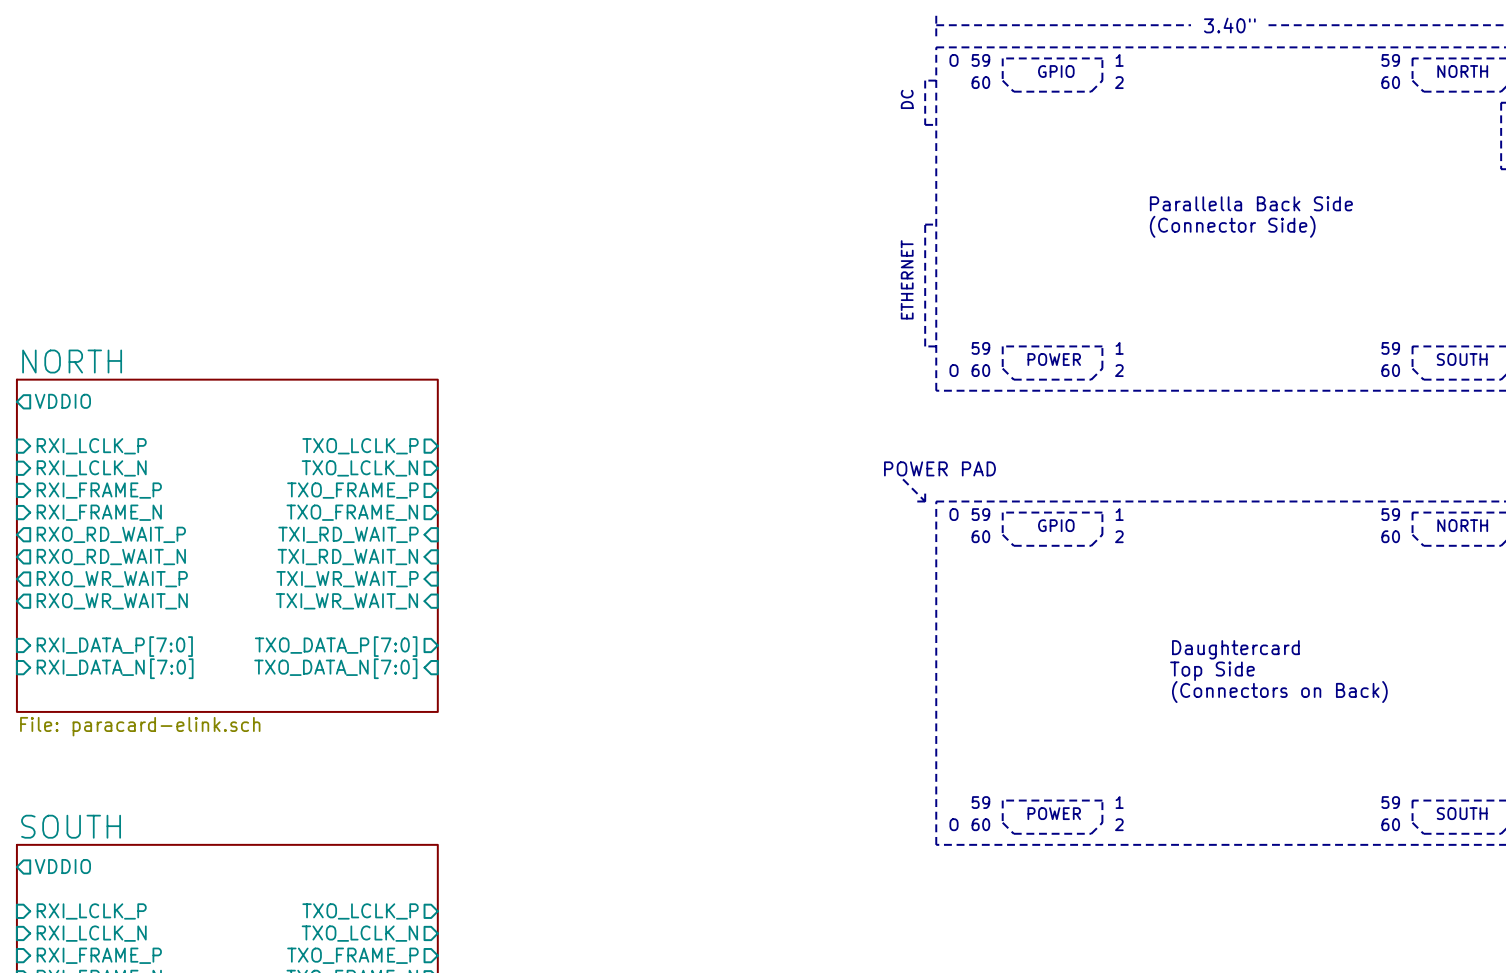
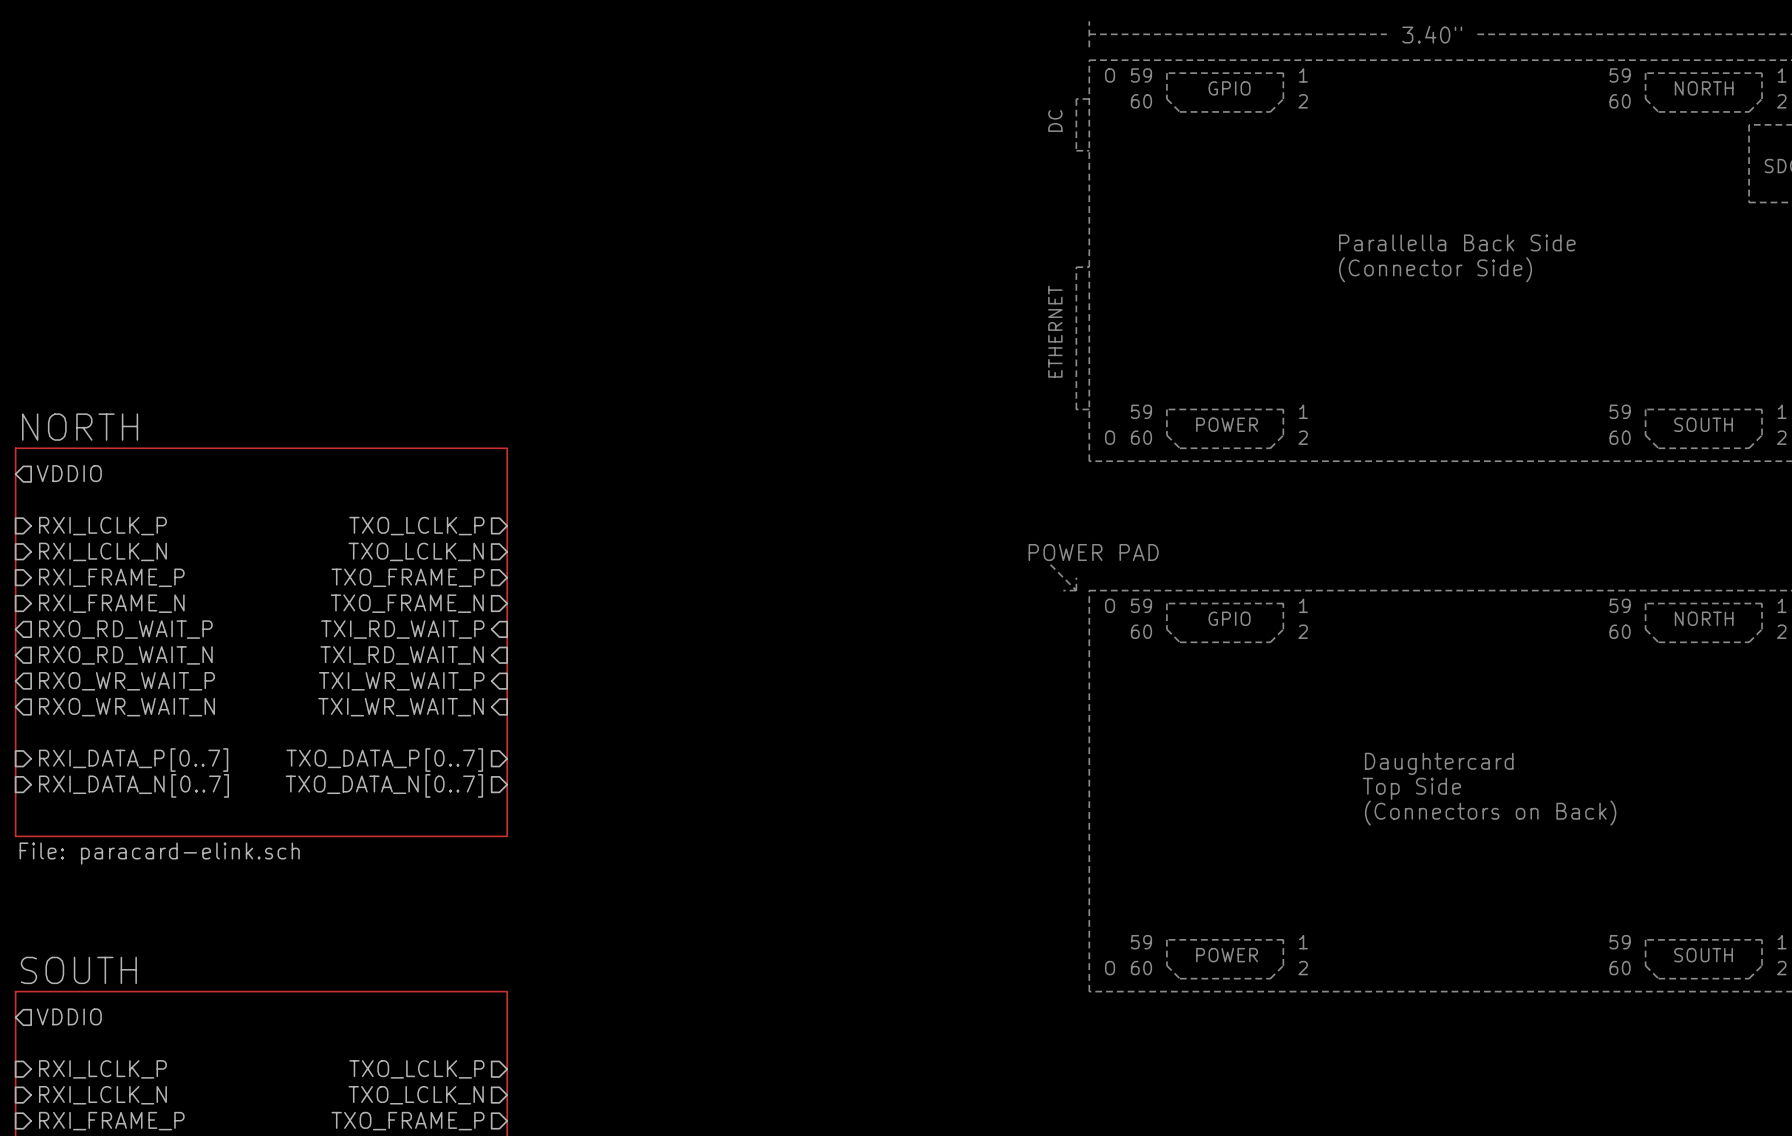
sheet pin: RXI_DATA_P[7:0] (114, 646) -> RXI_DATA_P[0..7] (133, 760)
sheet pin: TXO_DATA_P[7:0] (336, 646) -> TXO_DATA_P[0..7] (384, 760)
sheet pin: RXI_DATA_N[7:0] (115, 668) -> RXI_DATA_N[0..7] (133, 785)
sheet pin shape: input (335, 668) -> output (384, 785)
sheet pin: TXO_DATA_N[7:0] (335, 668) -> TXO_DATA_N[0..7] (384, 785)

